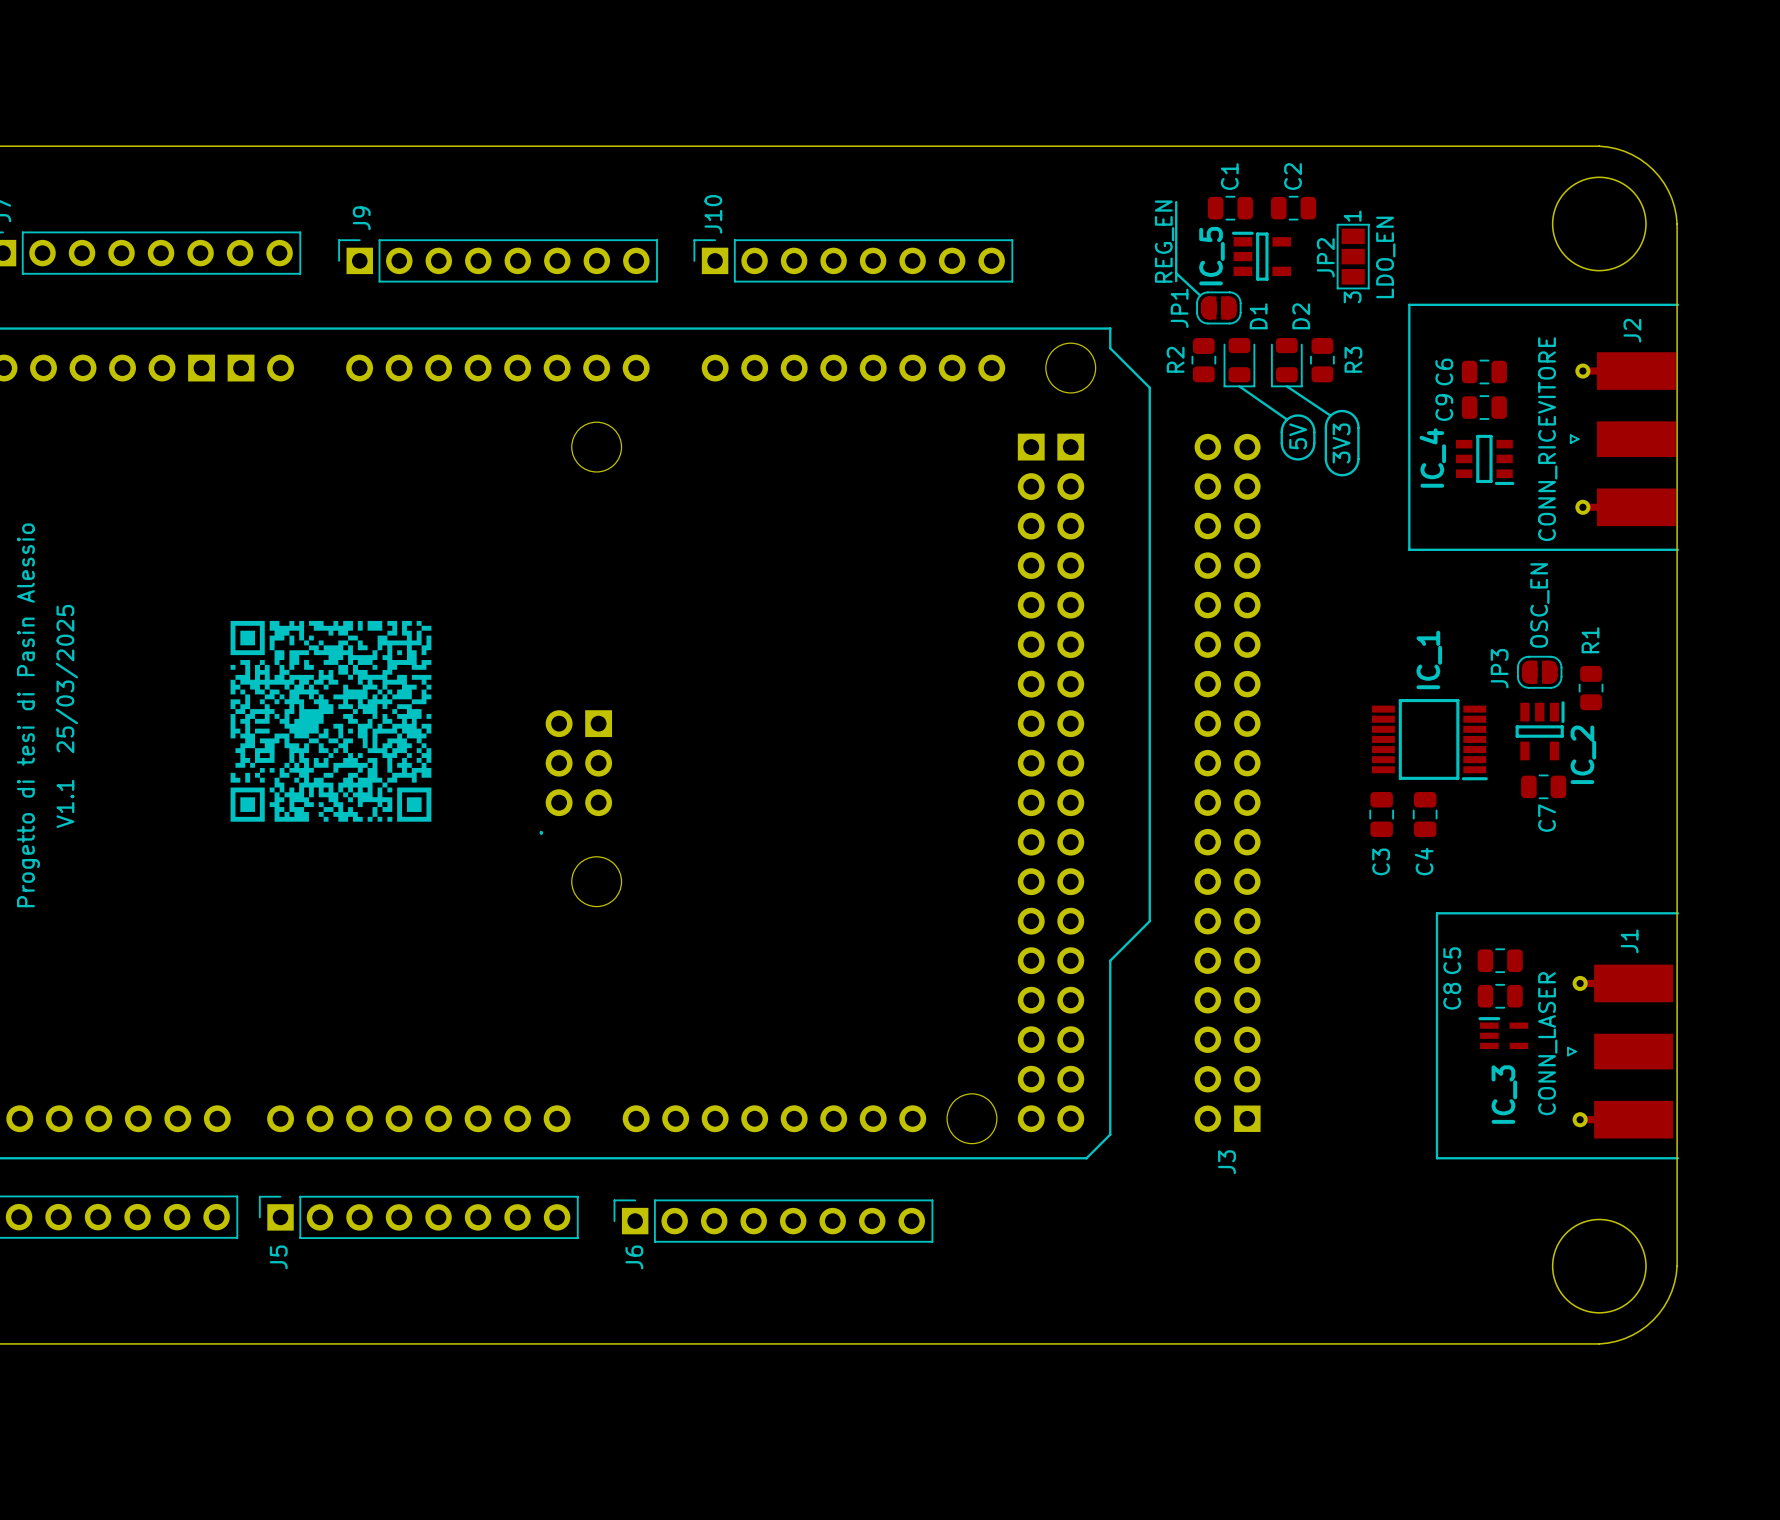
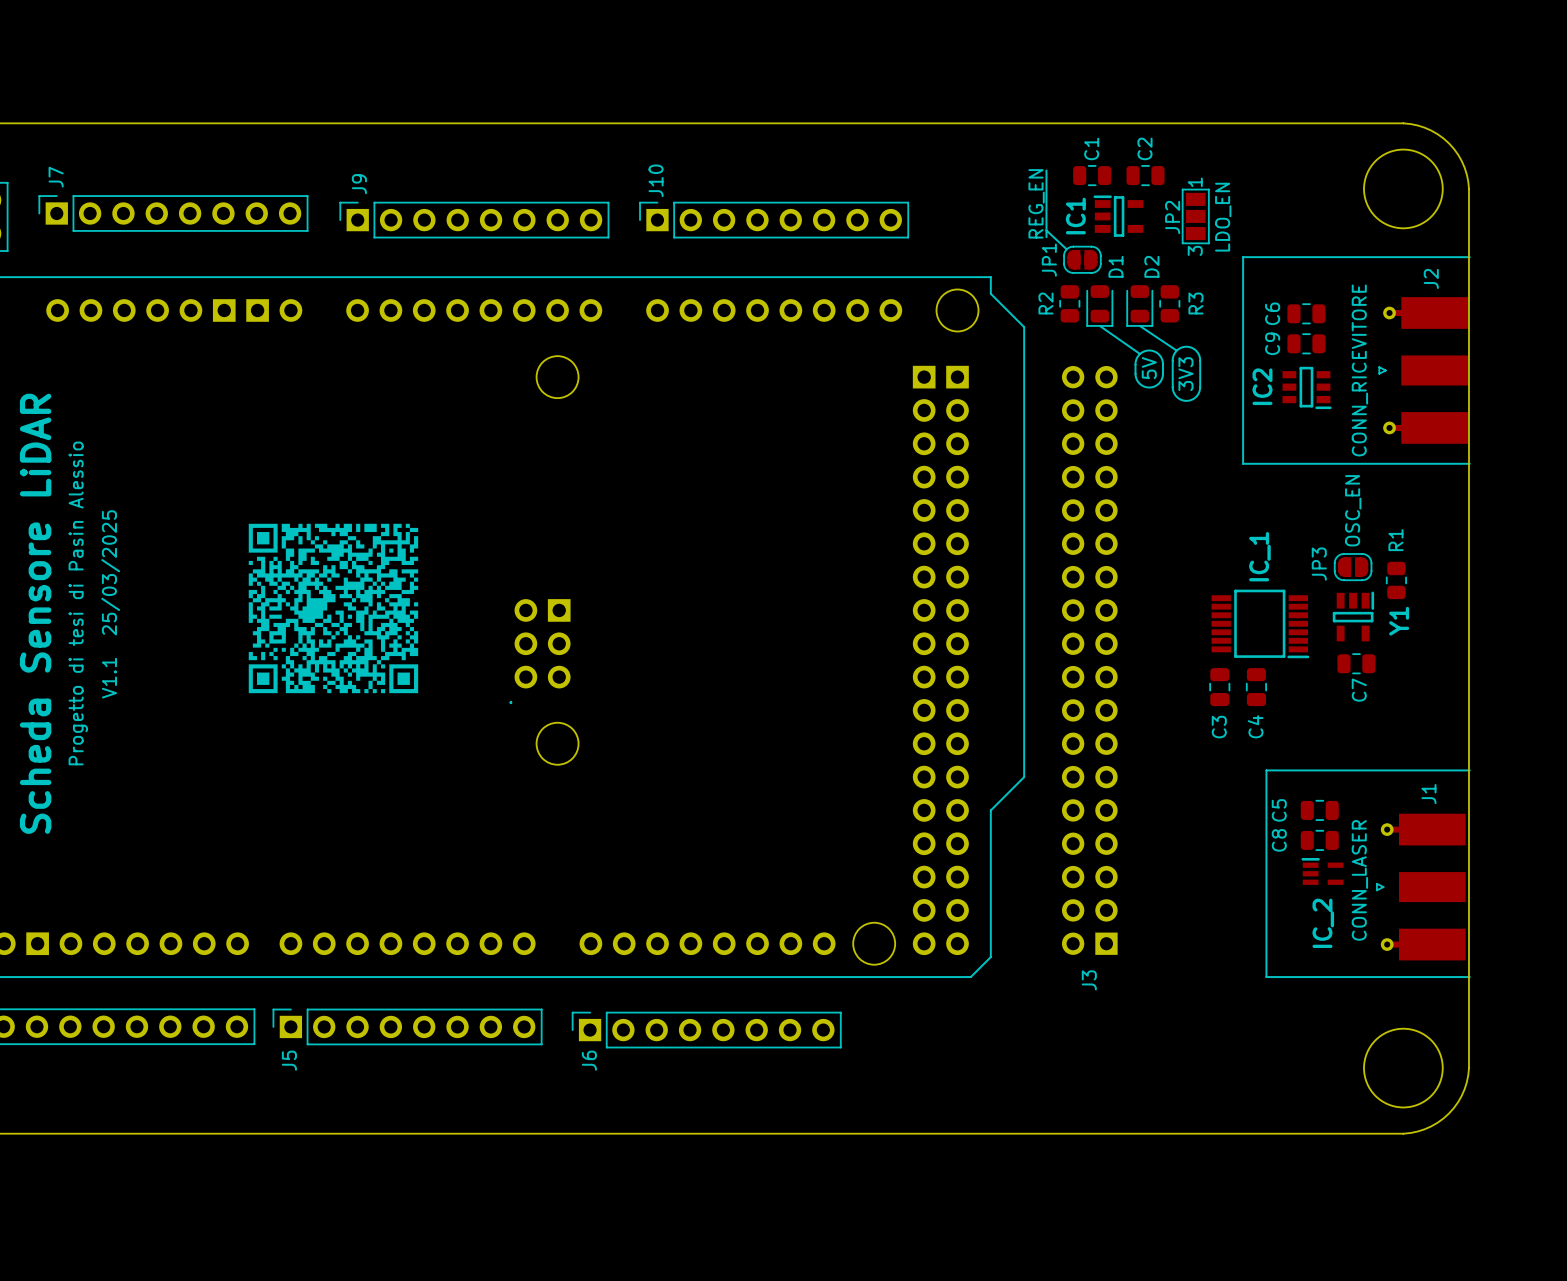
IC_5 name: IC_5 (1211, 256) -> IC1 (1075, 216)
IC_4 name: IC_4 (1432, 457) -> IC2 (1262, 386)
IC_2 name: IC_2 (1583, 754) -> Y1 (1399, 621)
IC_3 name: IC_3 (1504, 1094) -> IC_2 (1323, 923)

